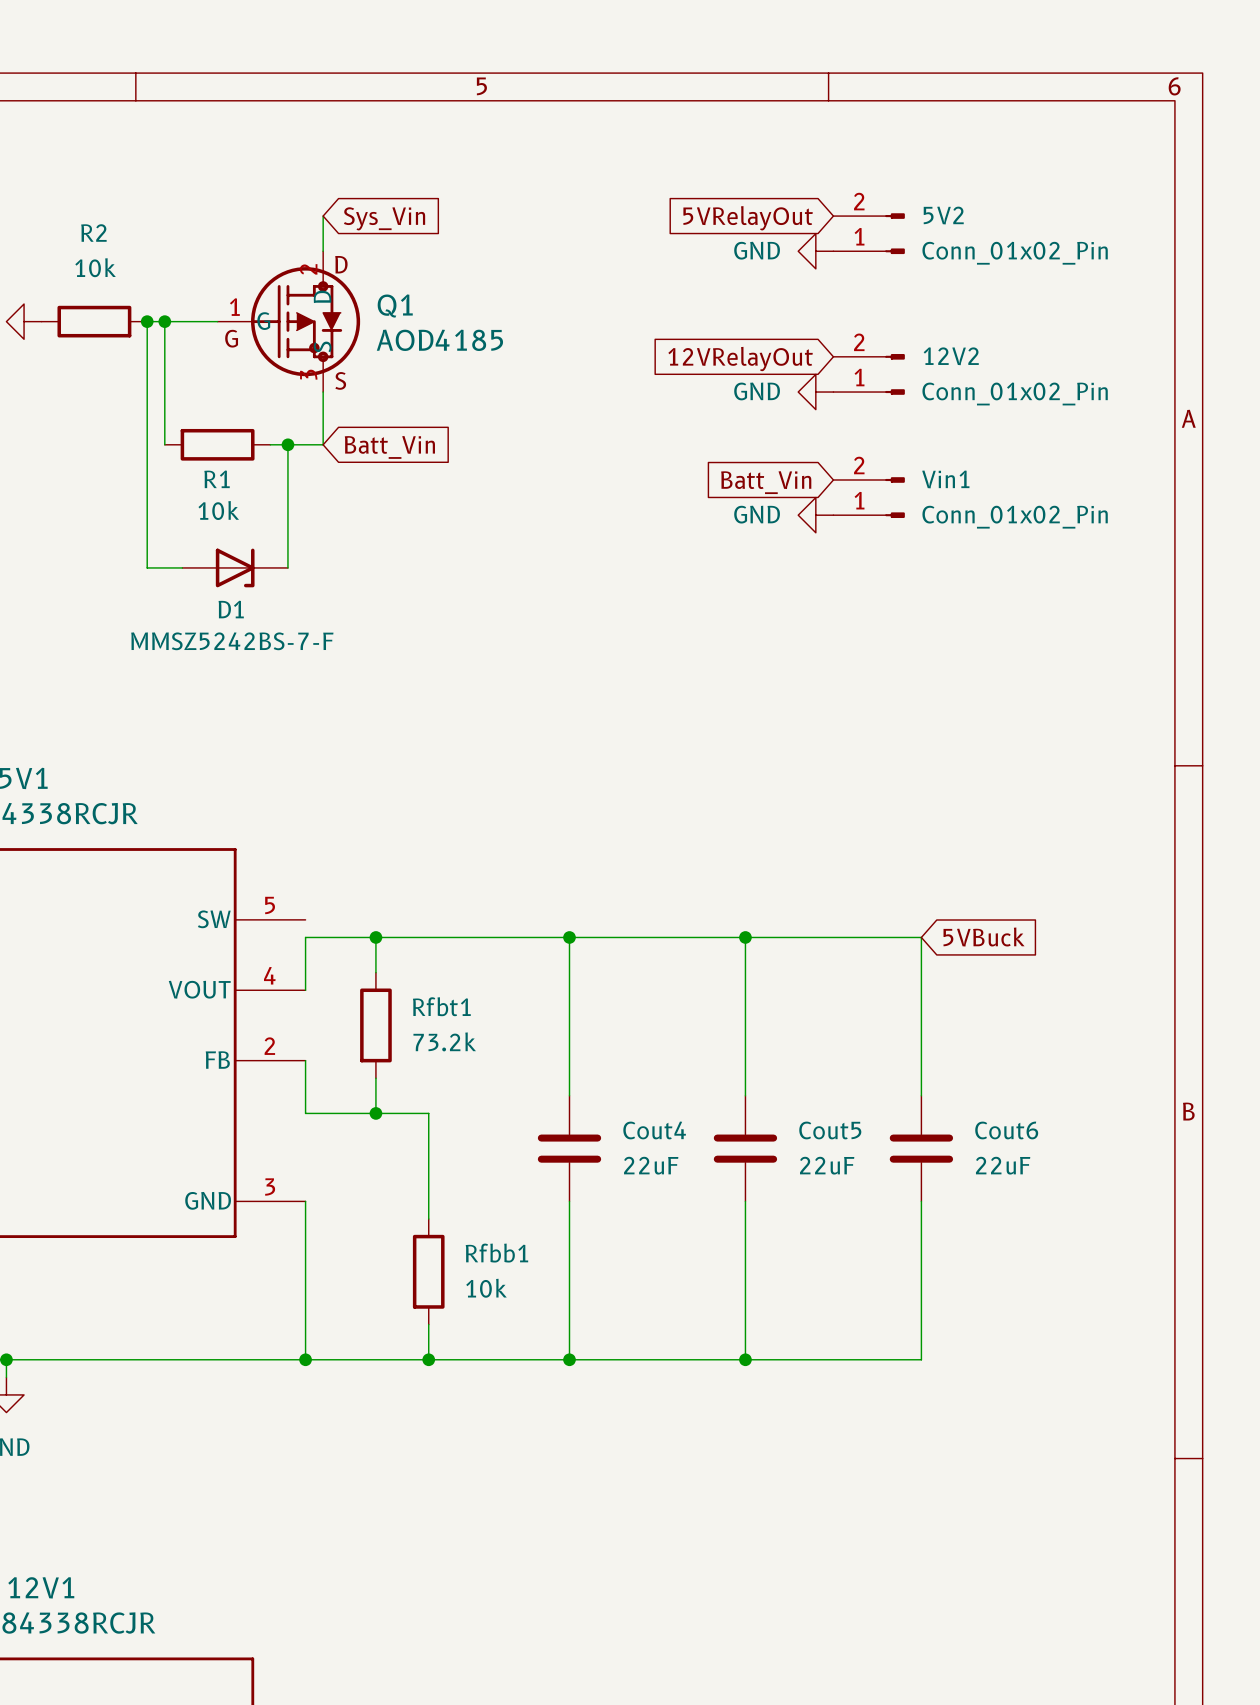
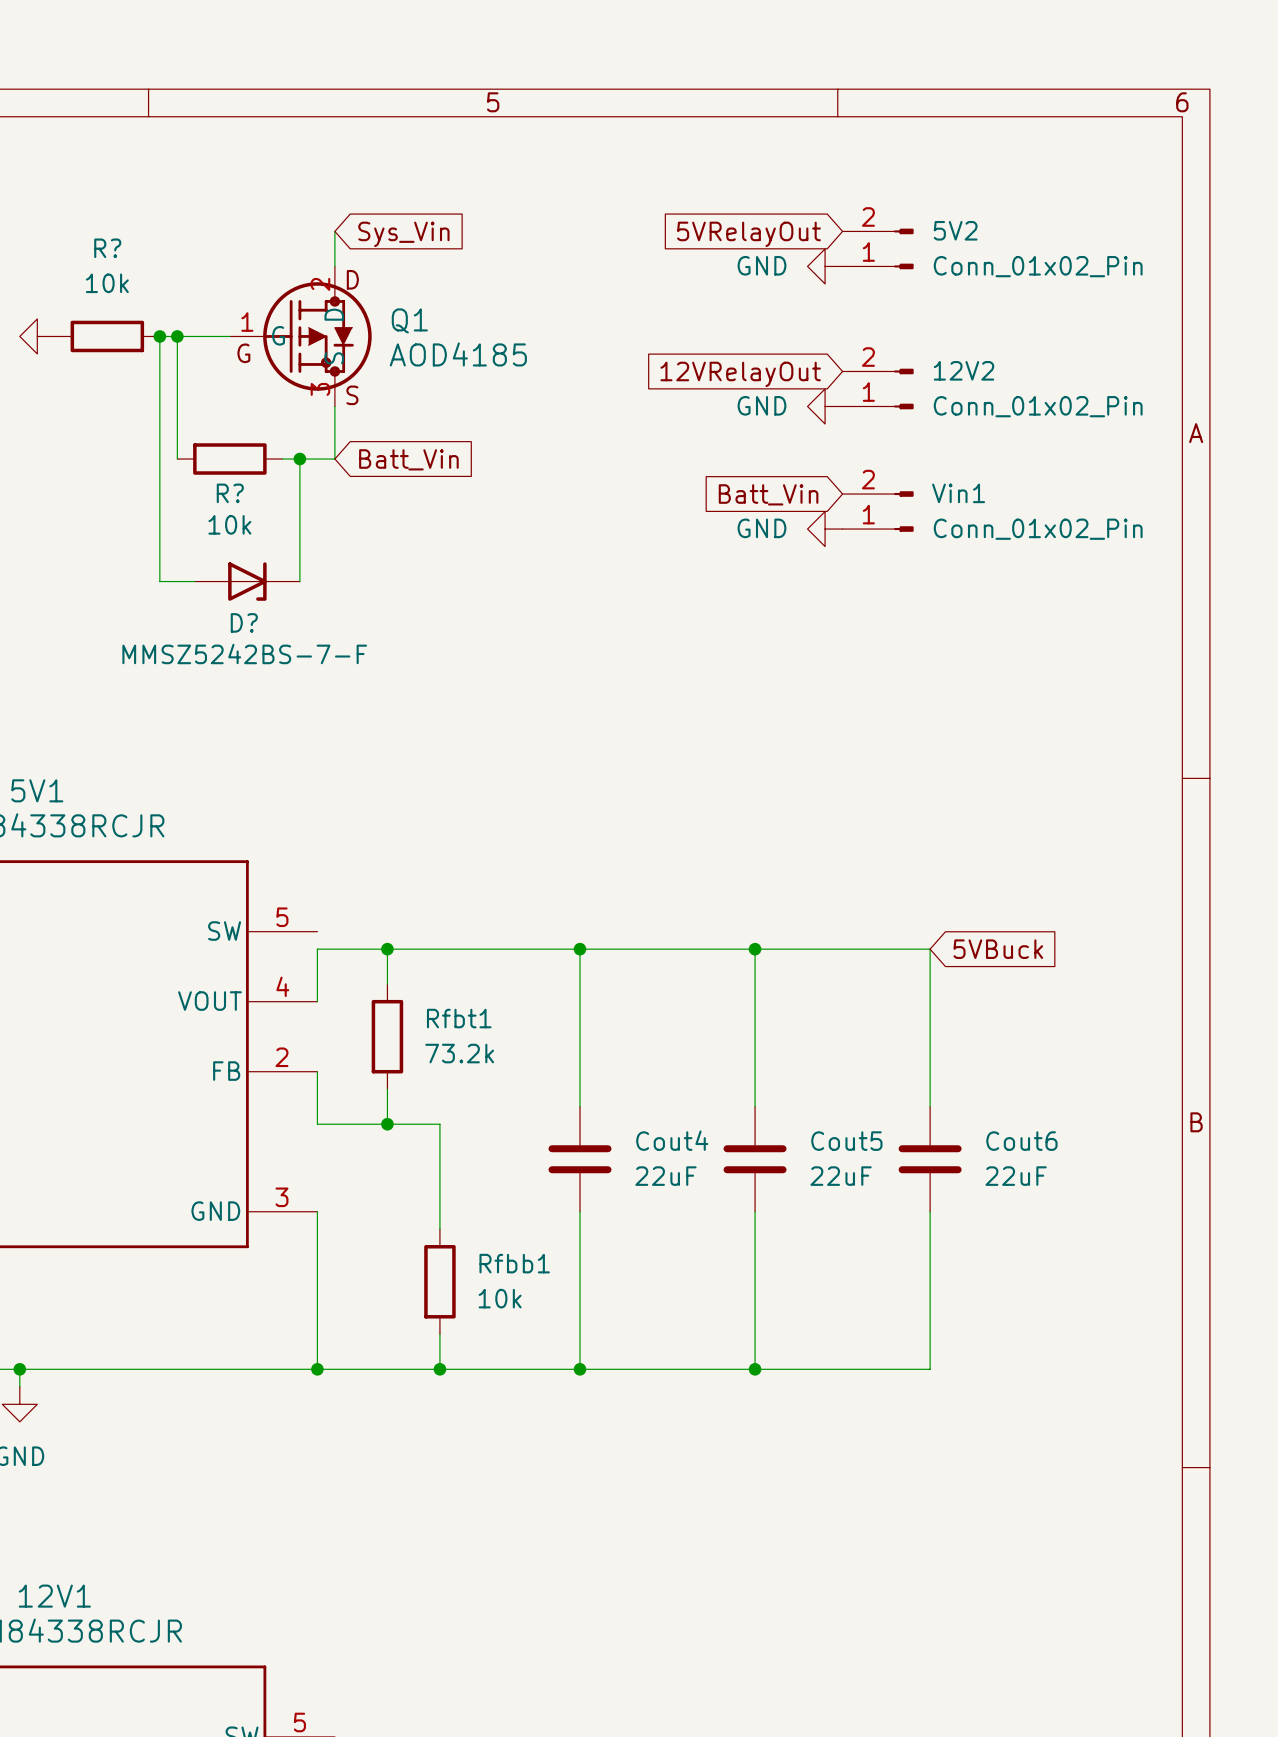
R2 name: R2 (93, 233) -> R? (107, 248)
R1 name: R1 (217, 479) -> R? (230, 493)
D1 name: D1 (231, 609) -> D? (244, 622)

